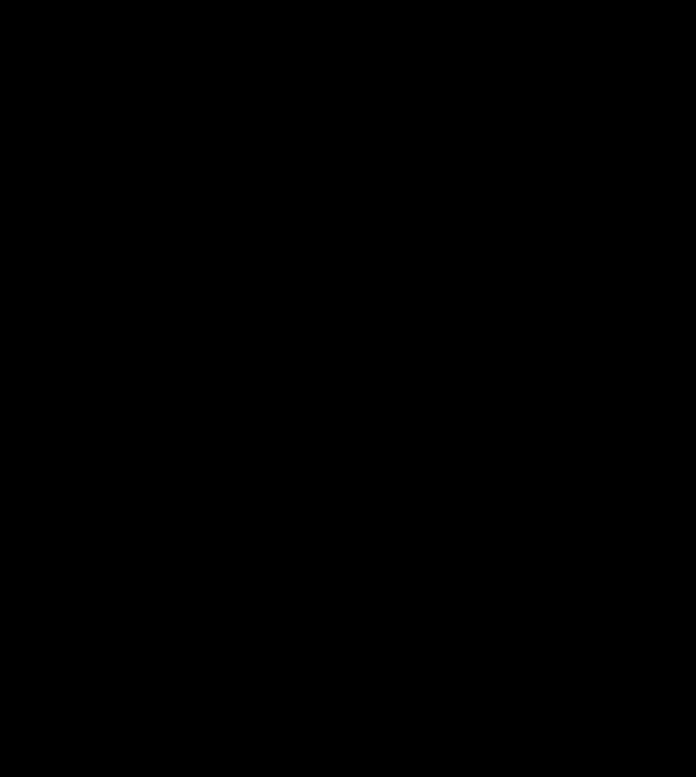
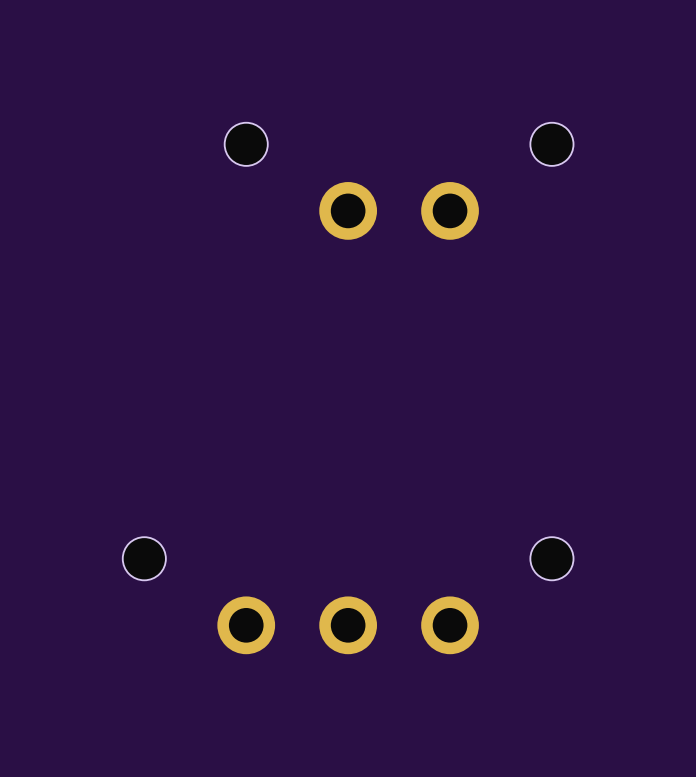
part: none -> (399, 181)
part: none -> (348, 595)

